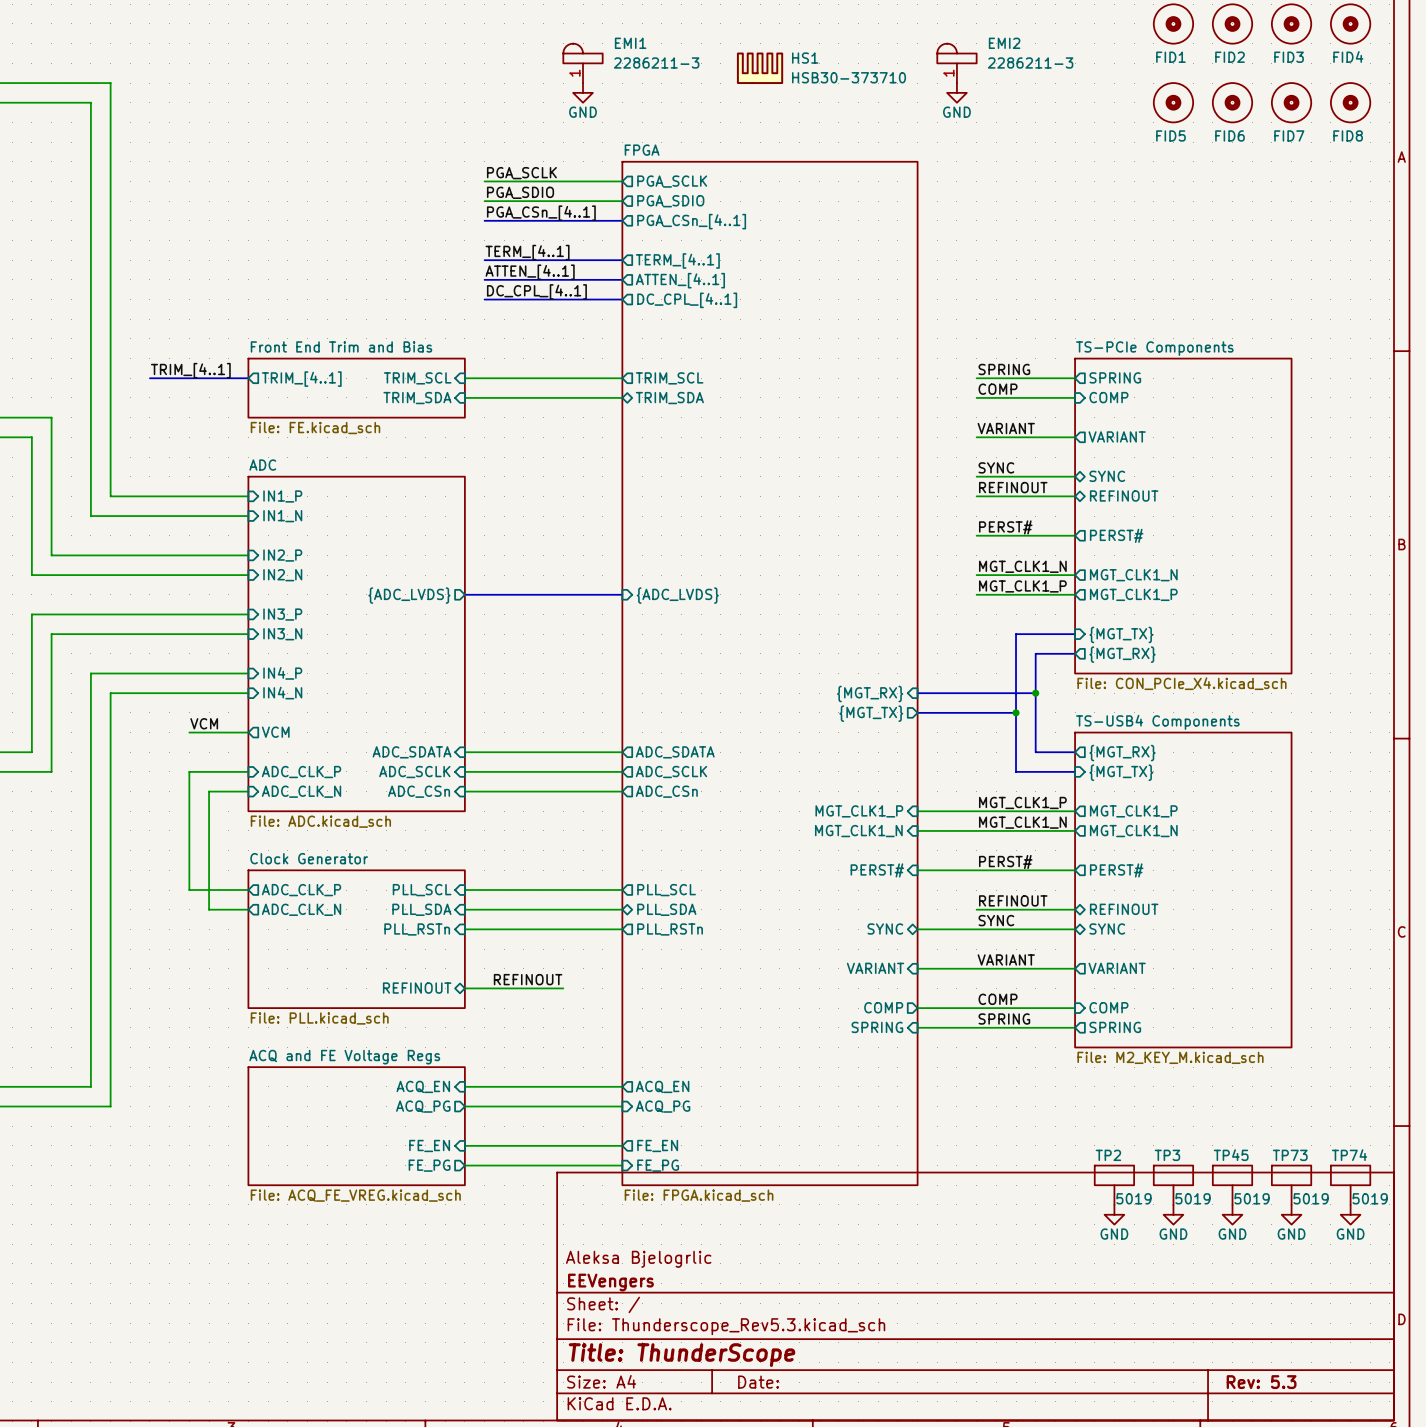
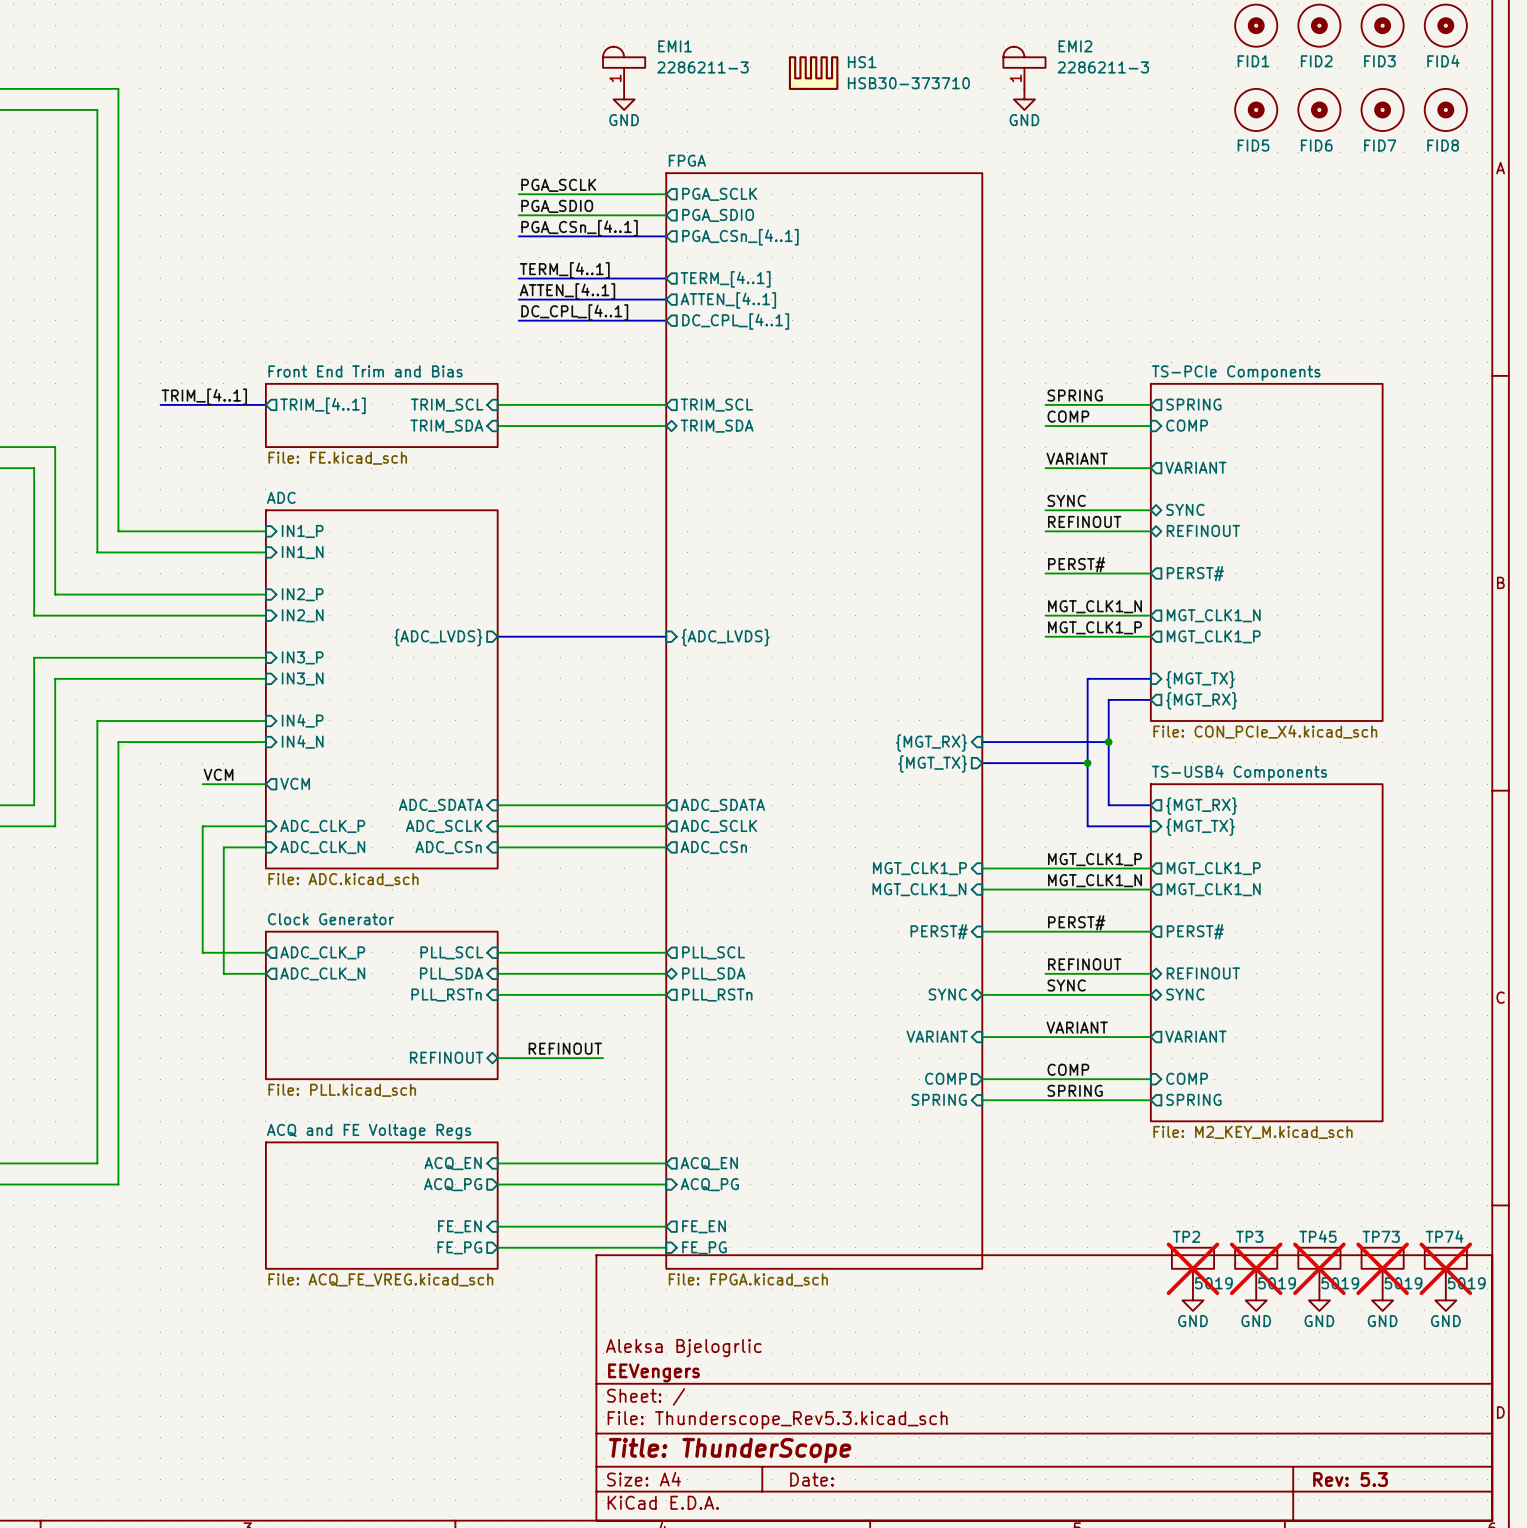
TP2 do-not-place cross: none -> (1192, 1268)
TP3 do-not-place cross: none -> (1256, 1268)
TP45 do-not-place cross: none -> (1319, 1268)
TP73 do-not-place cross: none -> (1382, 1268)
TP74 do-not-place cross: none -> (1445, 1268)

